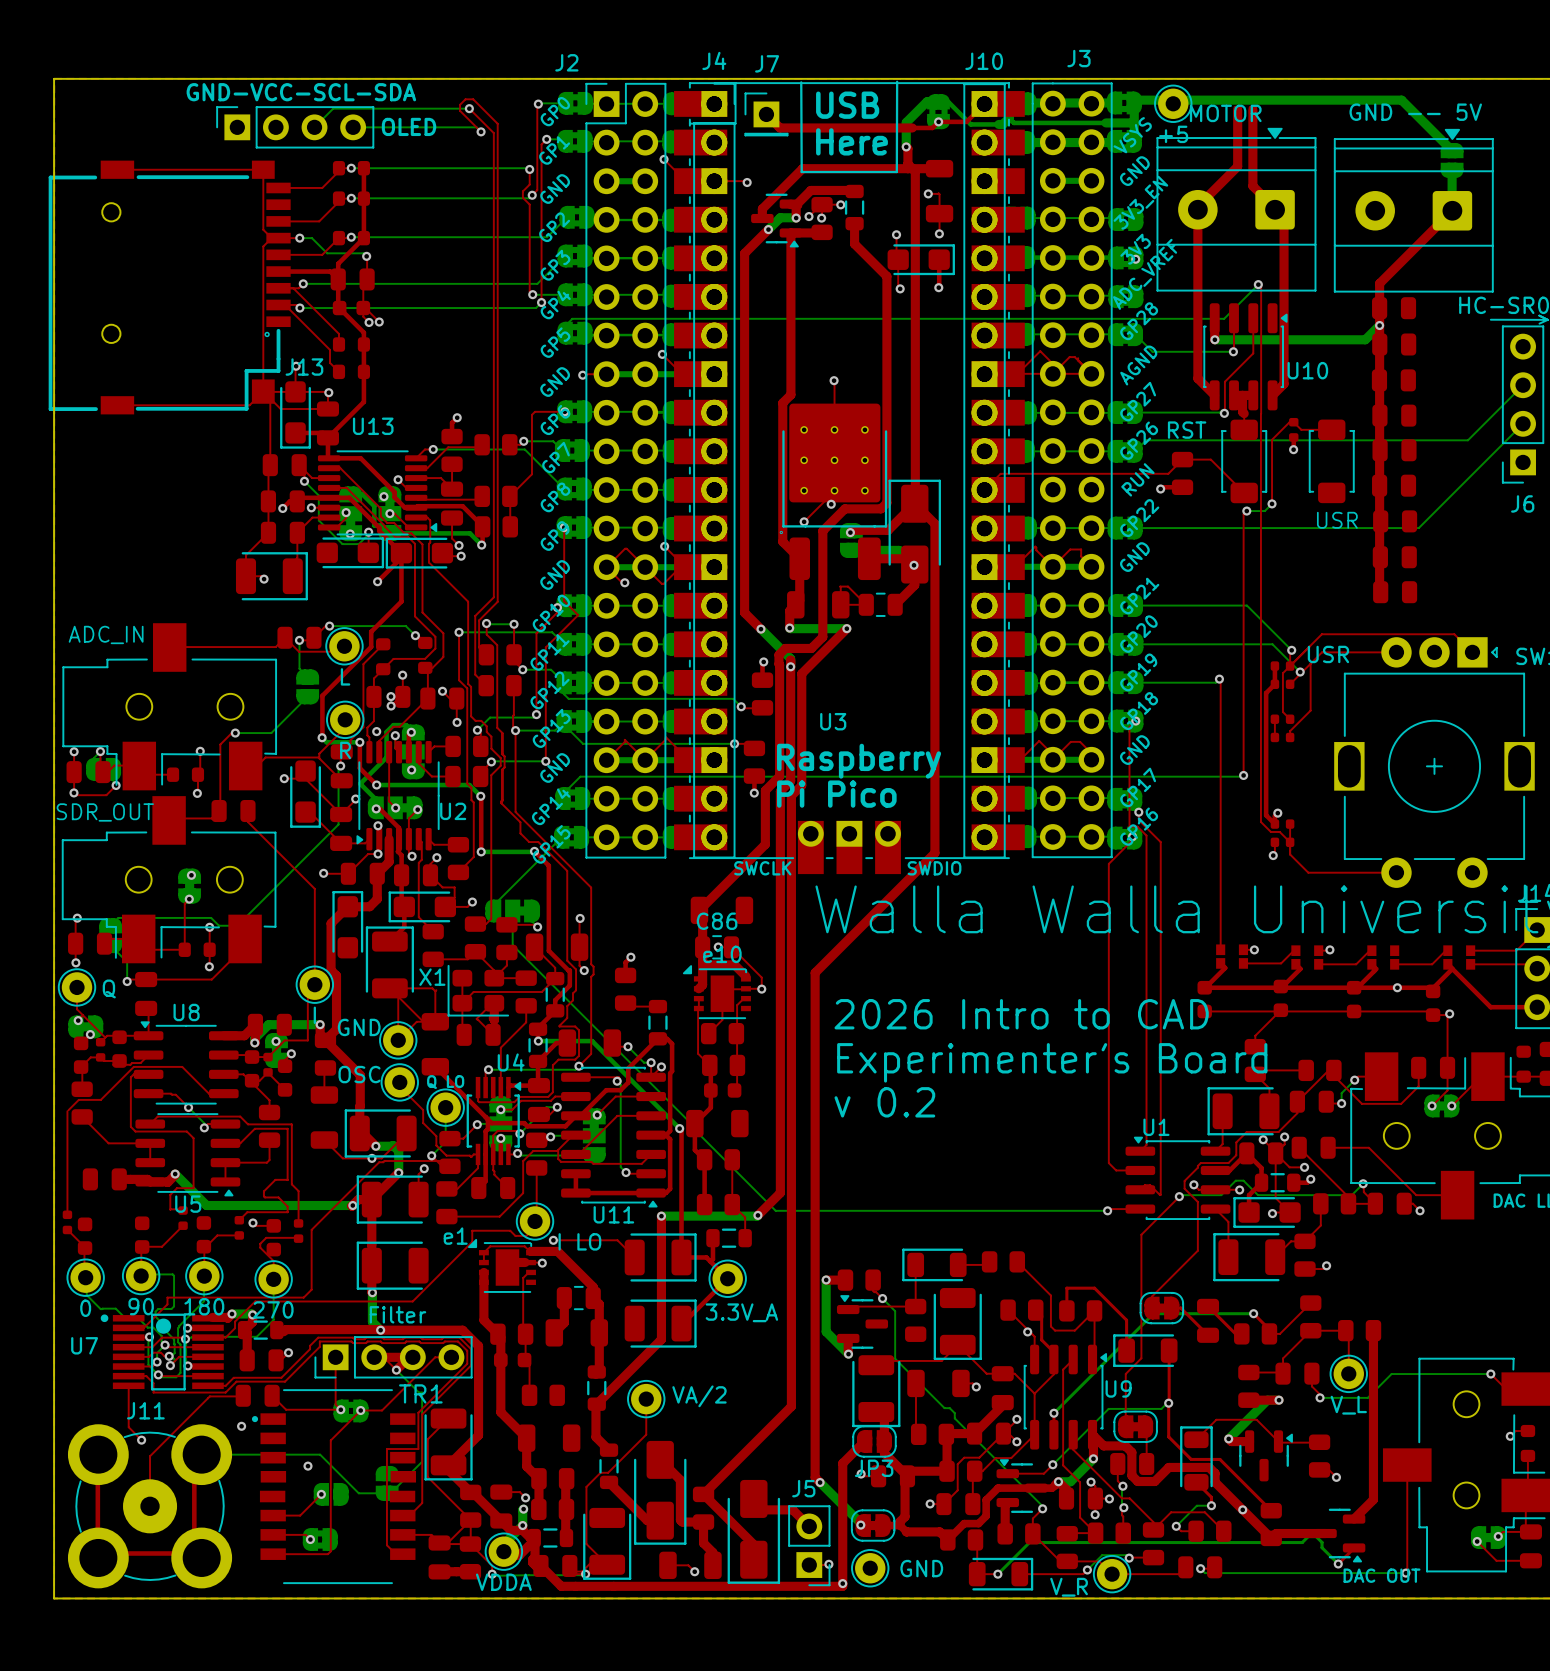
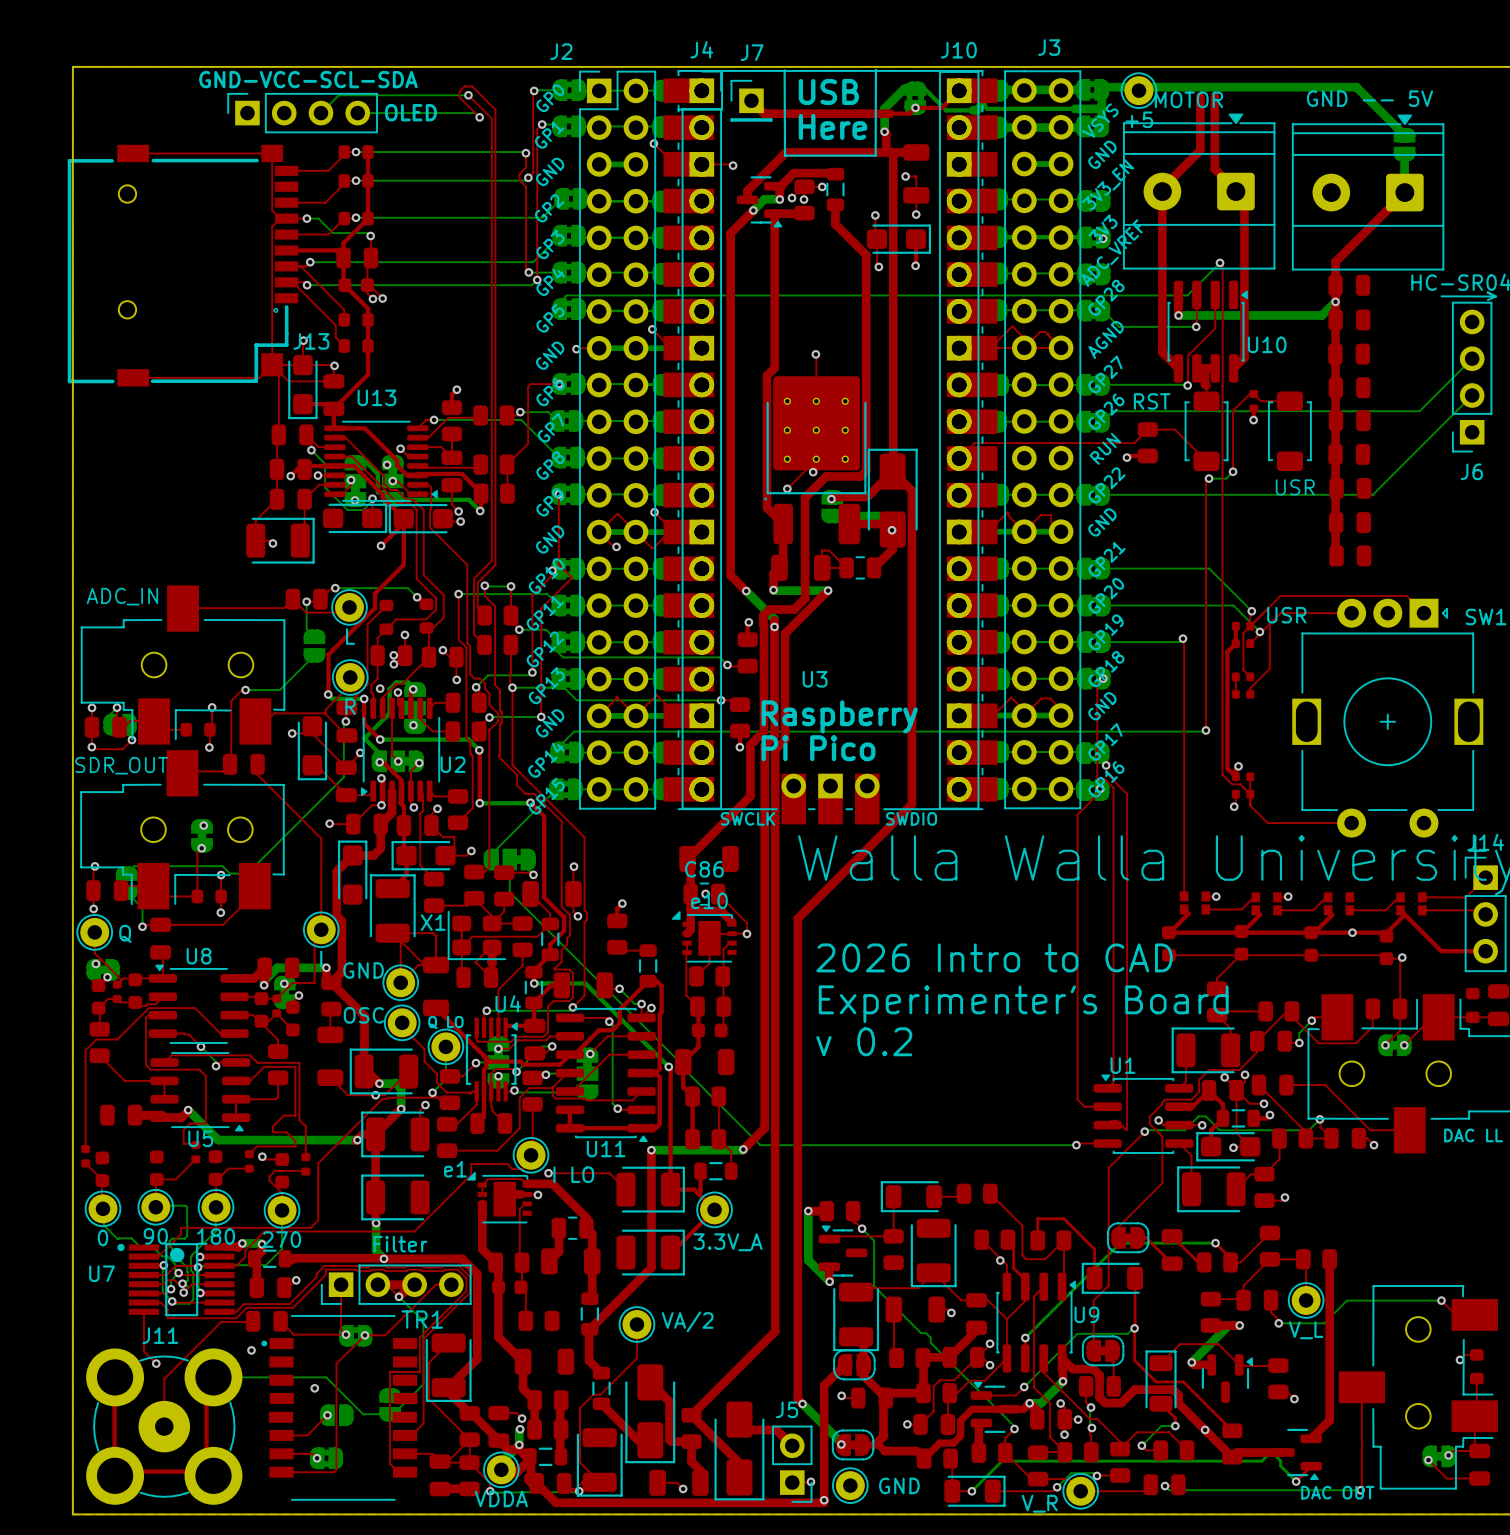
JP3 name: JP3 (874, 1468) -> none

